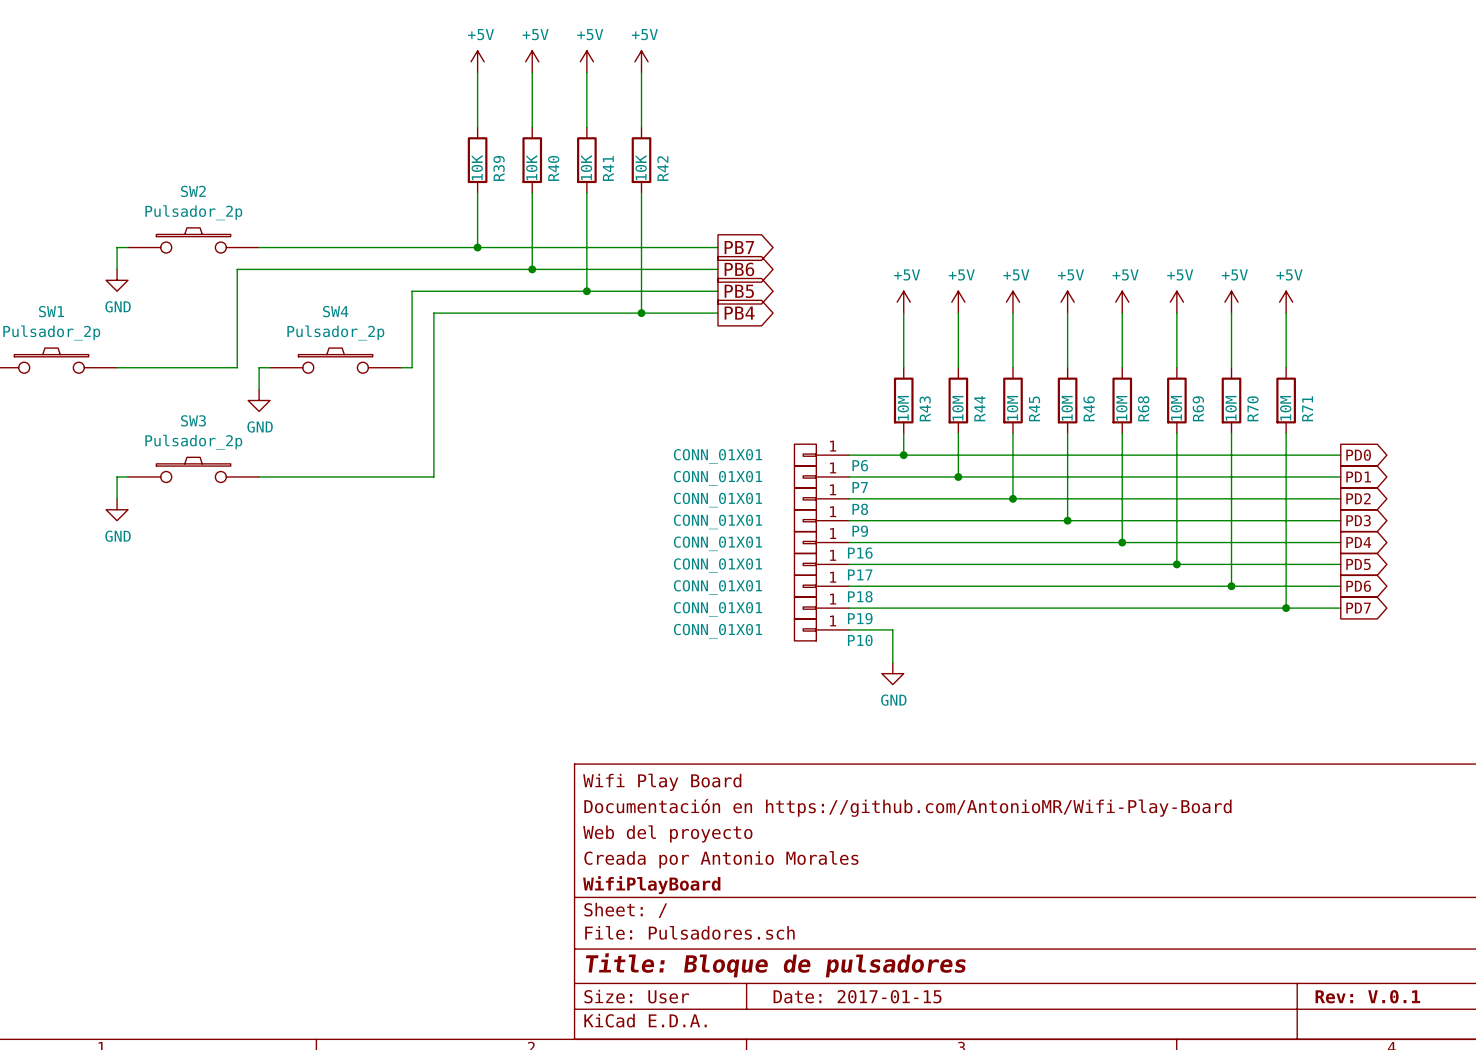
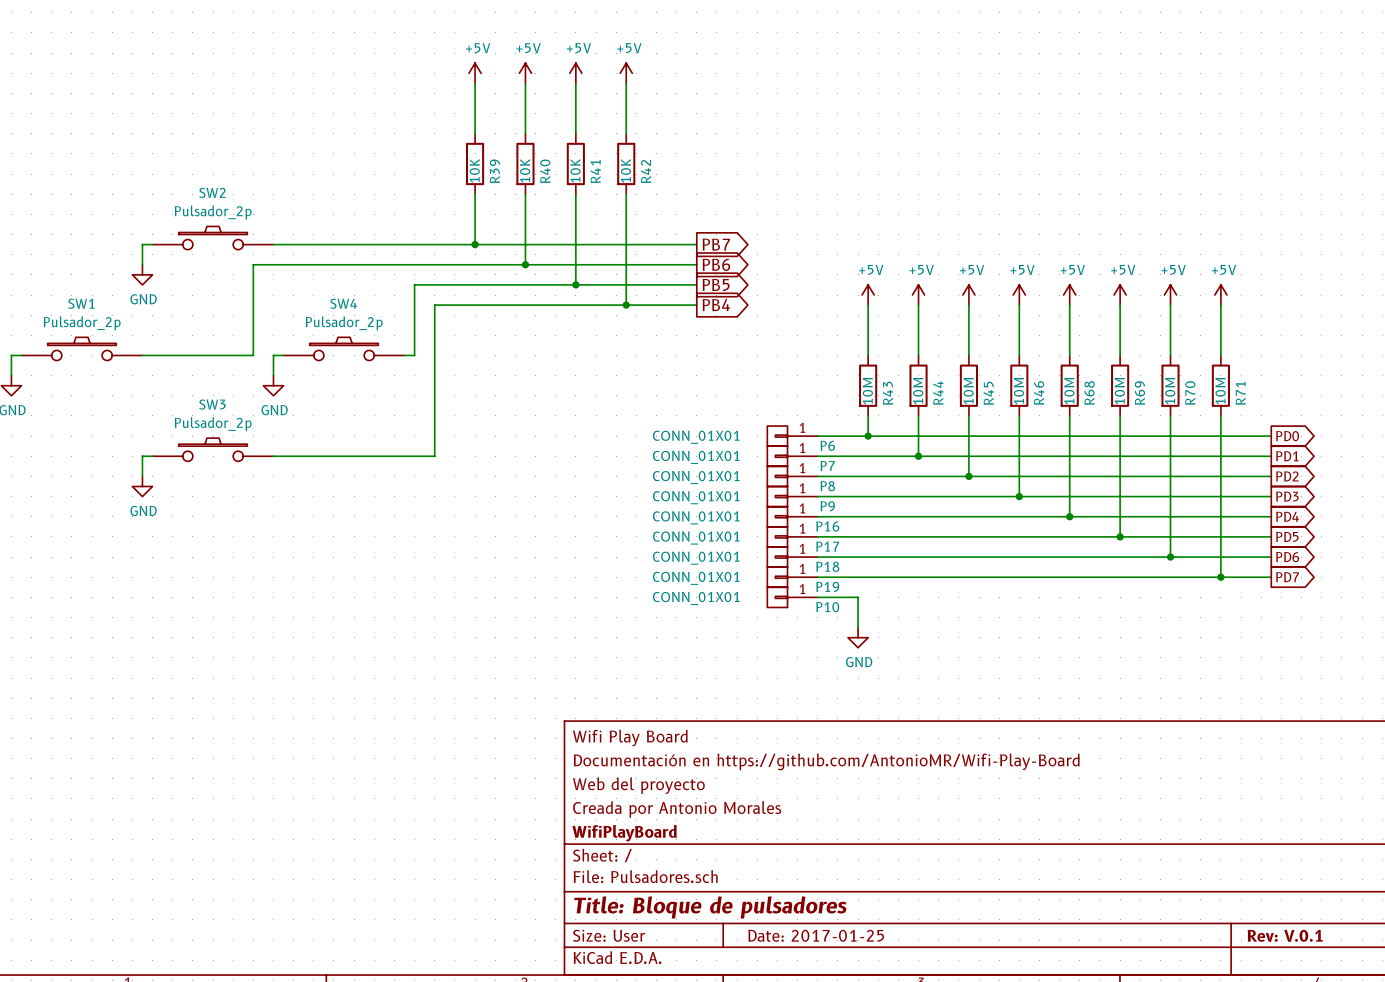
title block: Date: 2017-01-15 (857, 996) -> Date: 2017-01-25 (816, 935)

